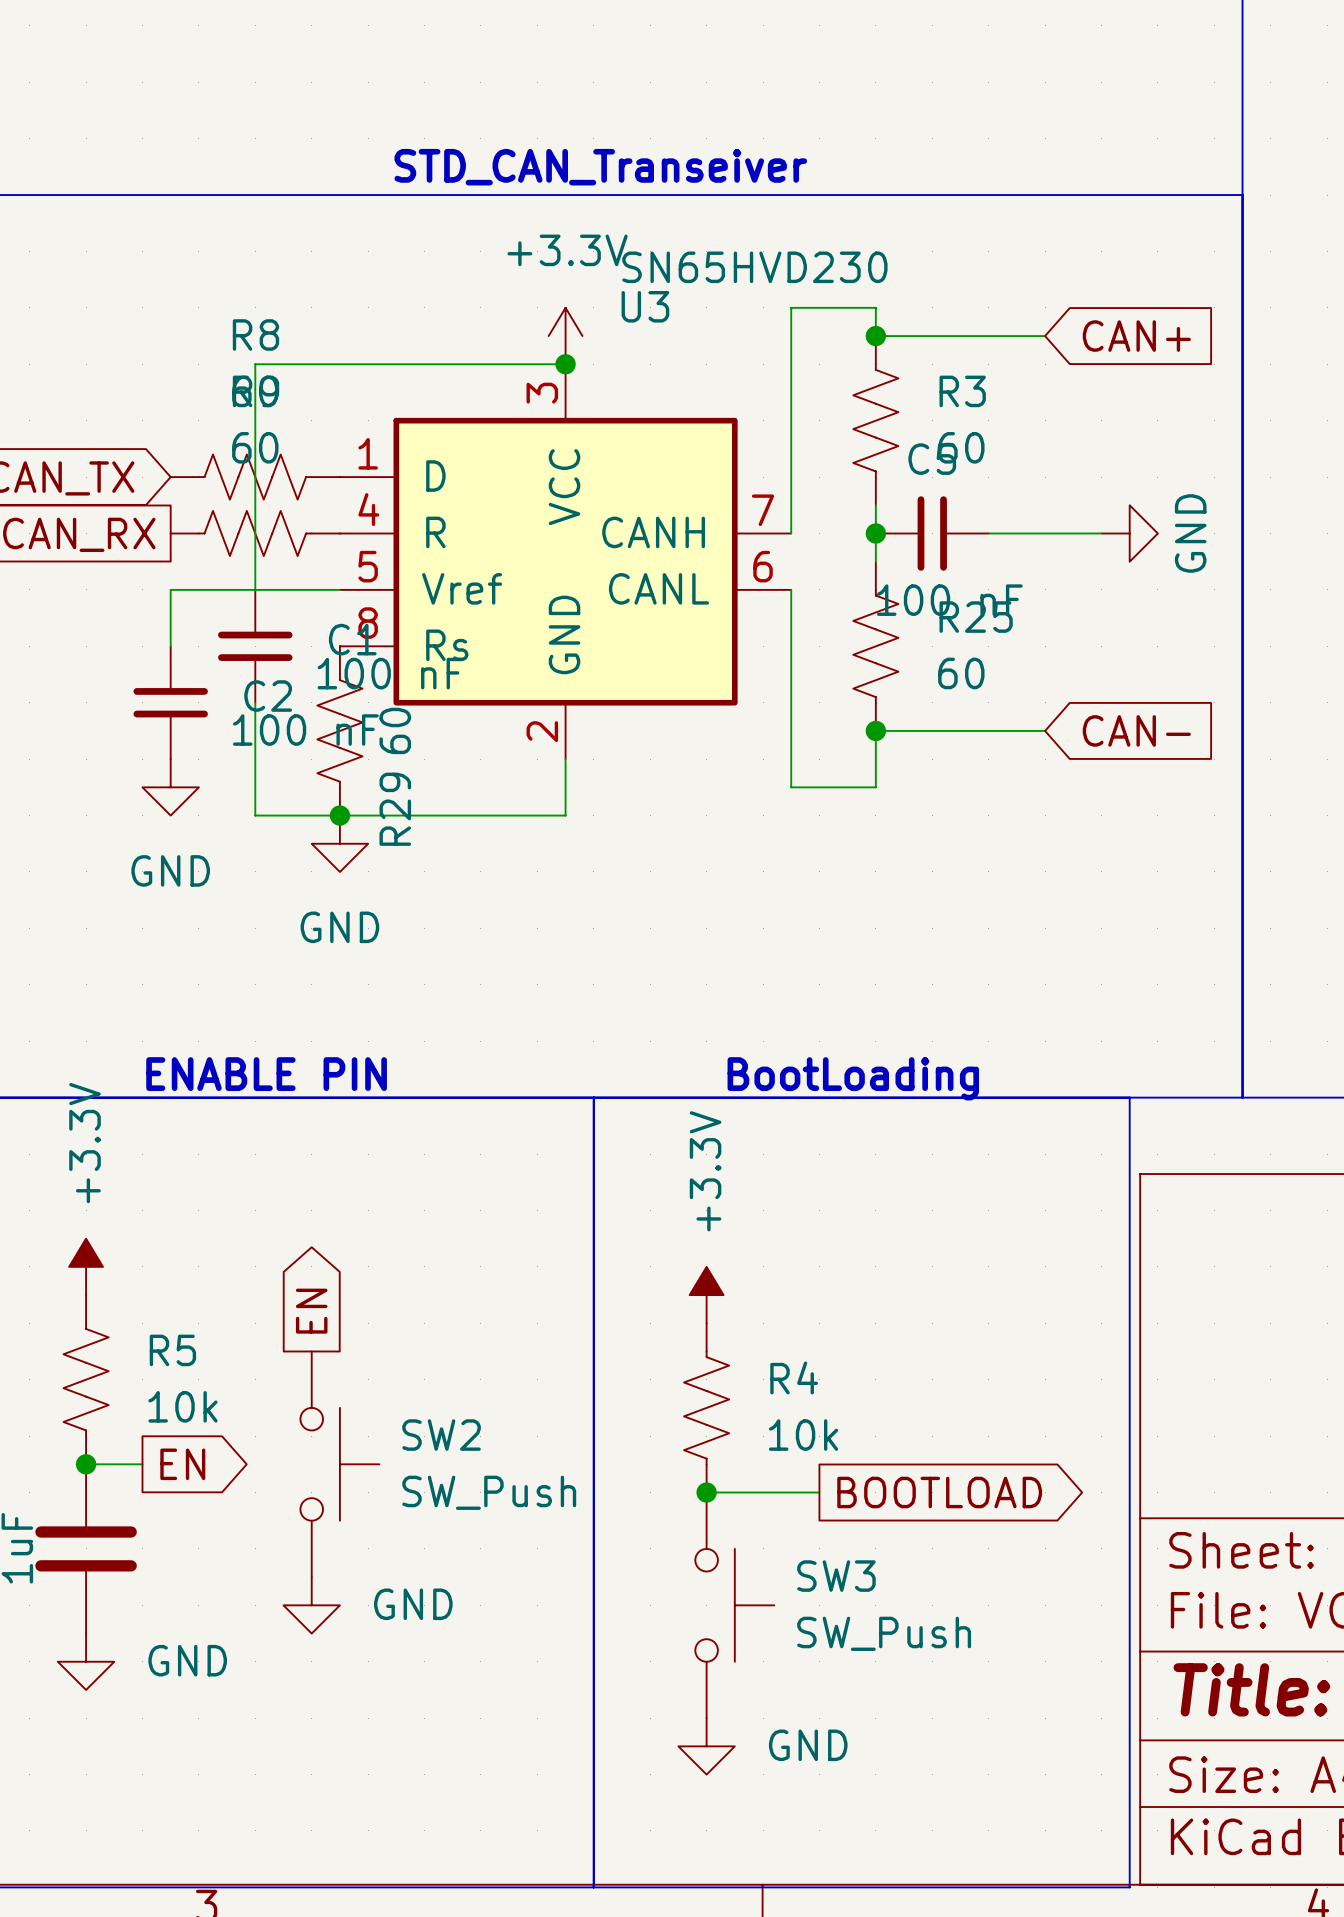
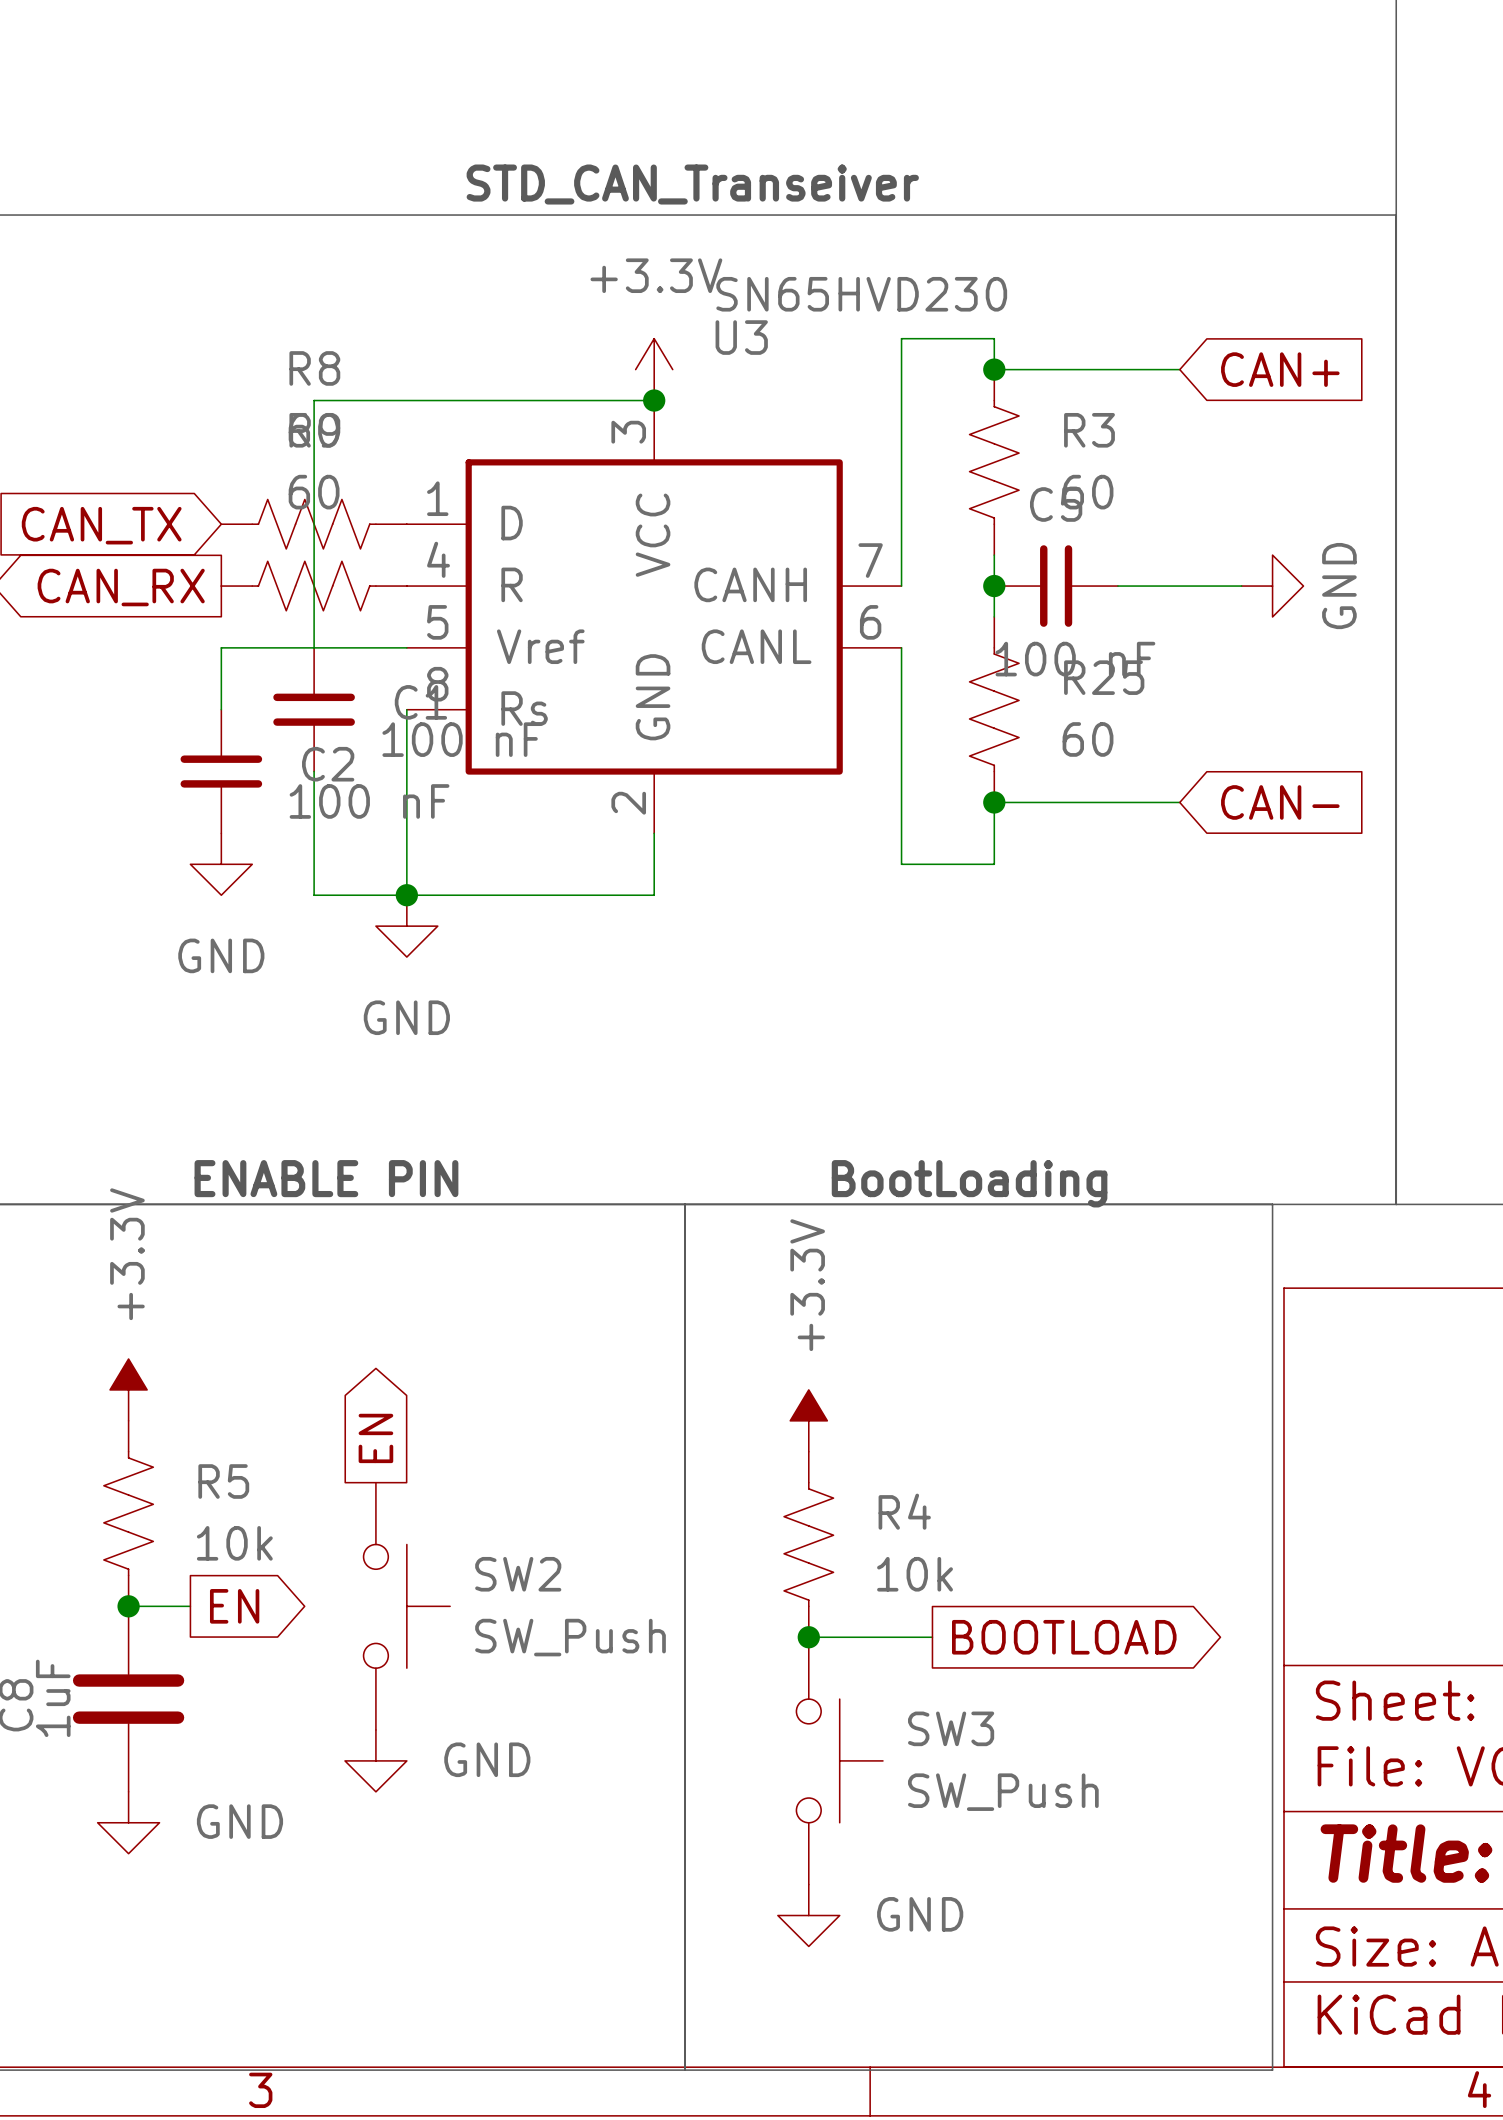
wire: none -> (406, 709) (406, 895)
R29: 60 (339, 730) -> none

